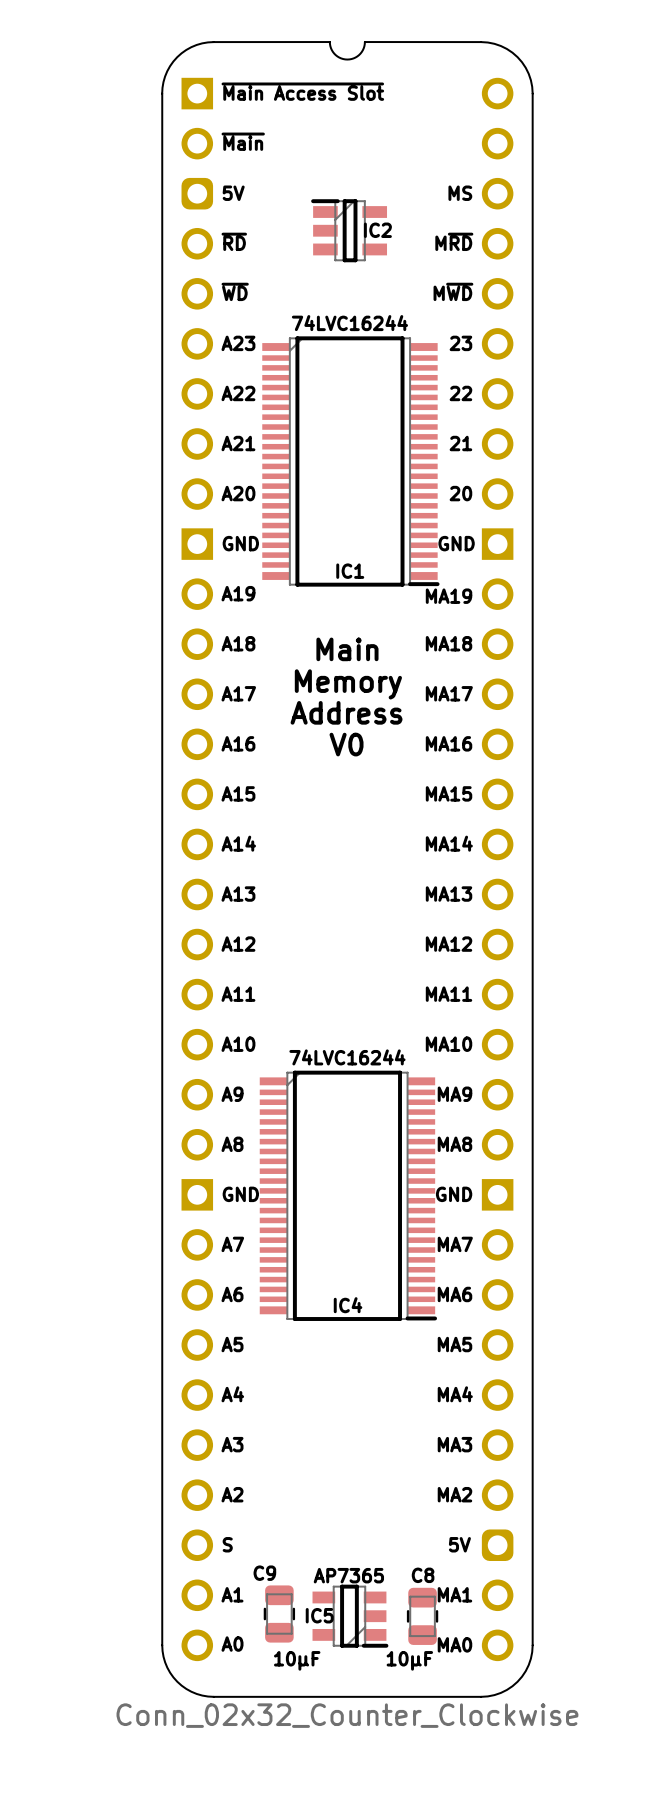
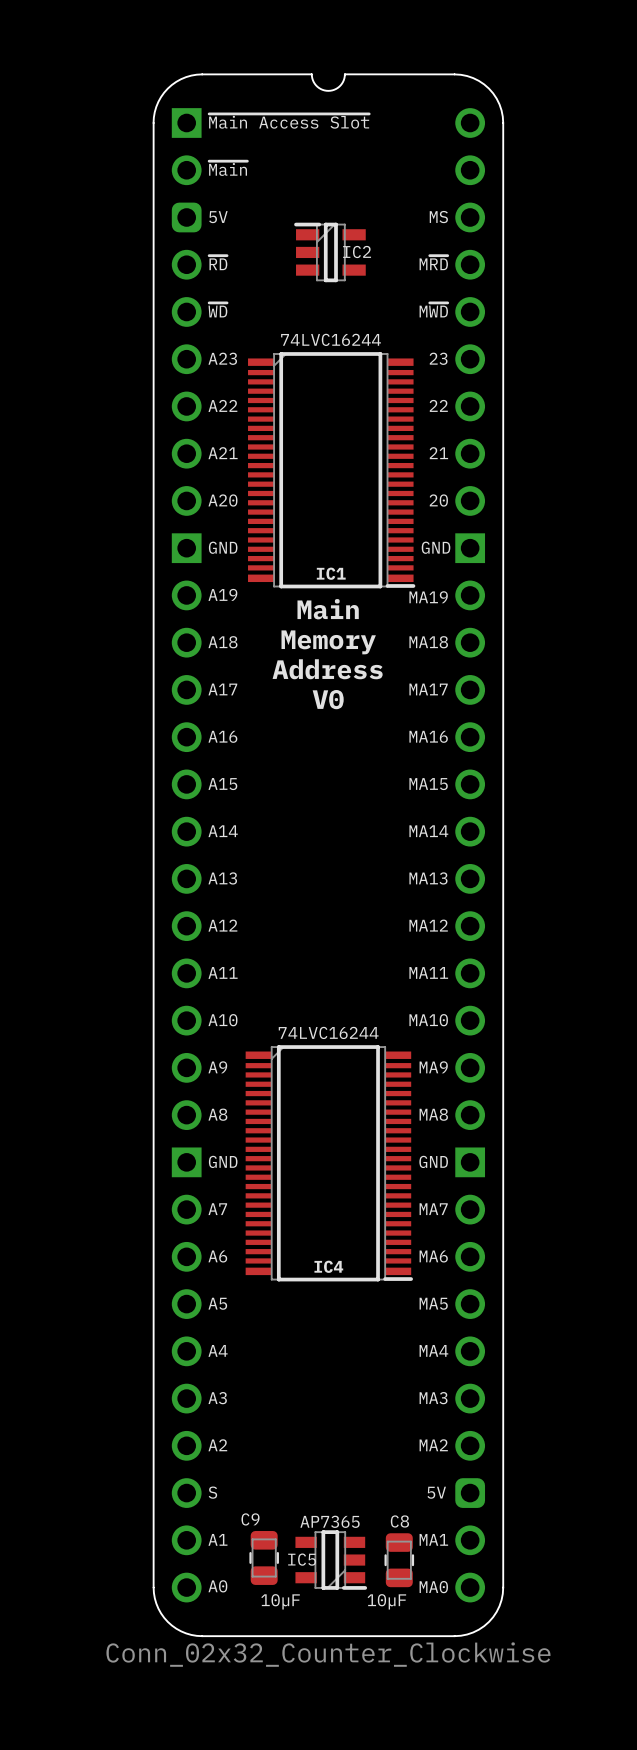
text: none -> Main (328, 609)
text: Main (347, 649) -> Memory (328, 642)
text: Memory (348, 684) -> Address (327, 669)
text: Address (346, 712) -> V0 (328, 699)
text: V0 (346, 744) -> none

